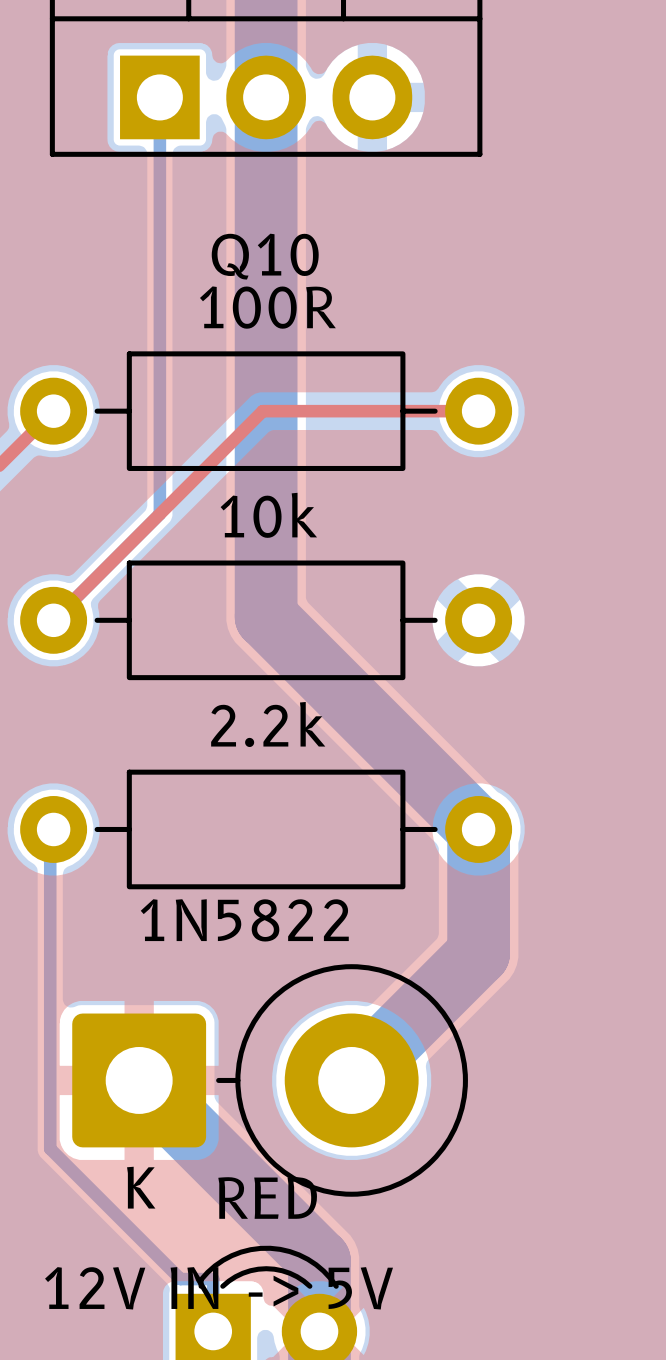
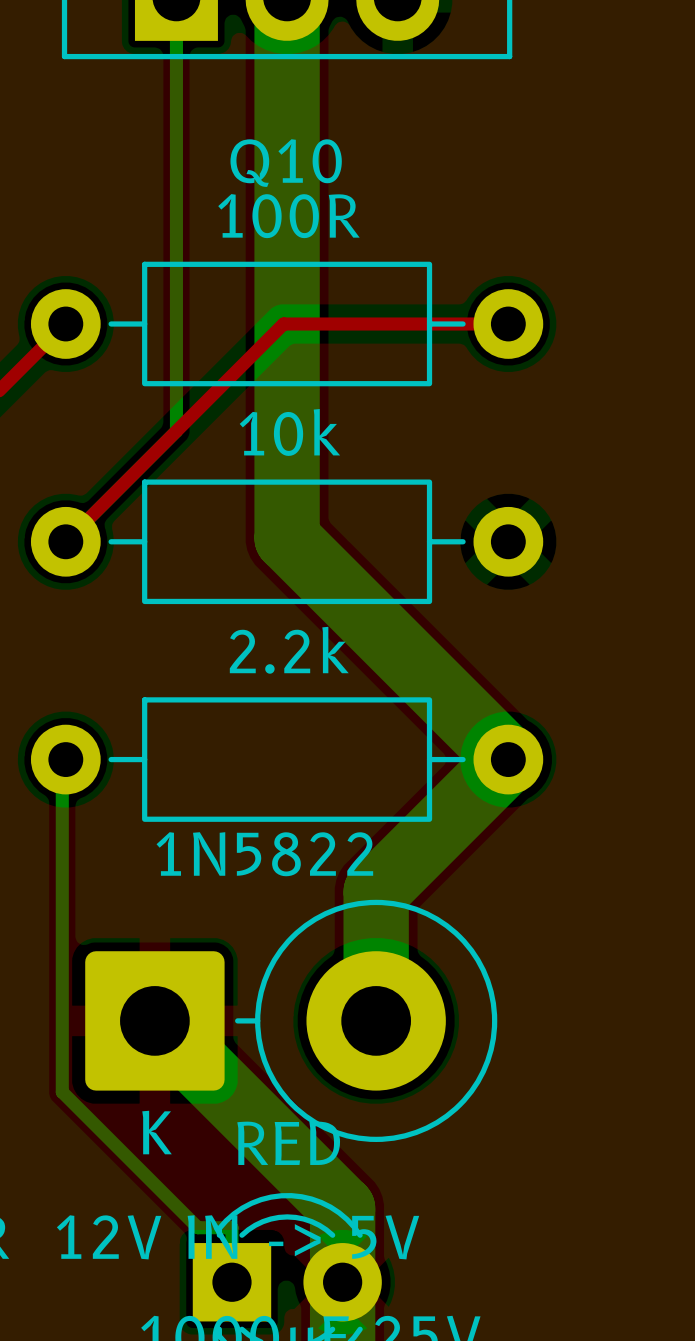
bottom track: (478, 829) (478, 953) (351, 1080) -> (508, 759) (376, 891) (376, 1020)

